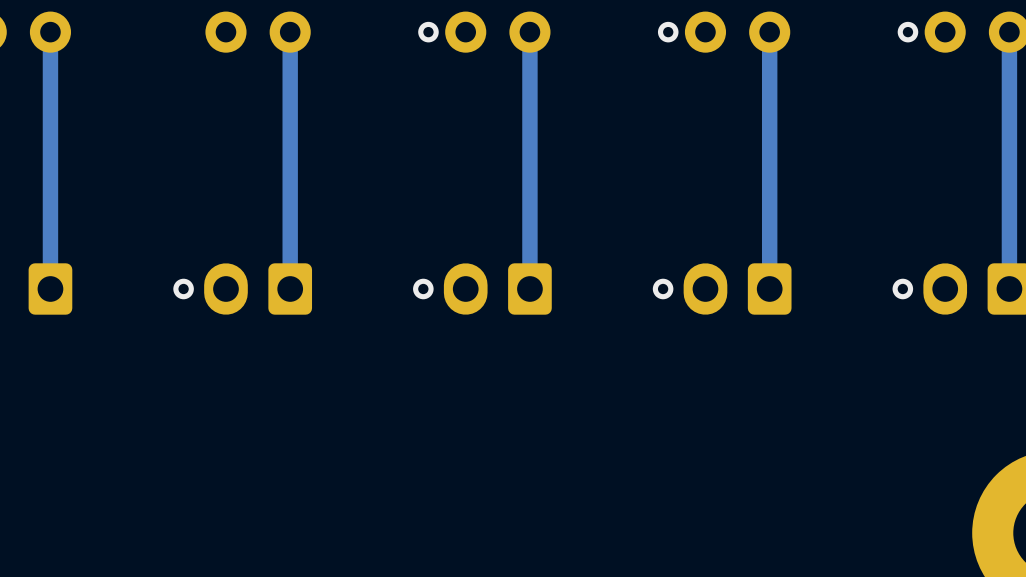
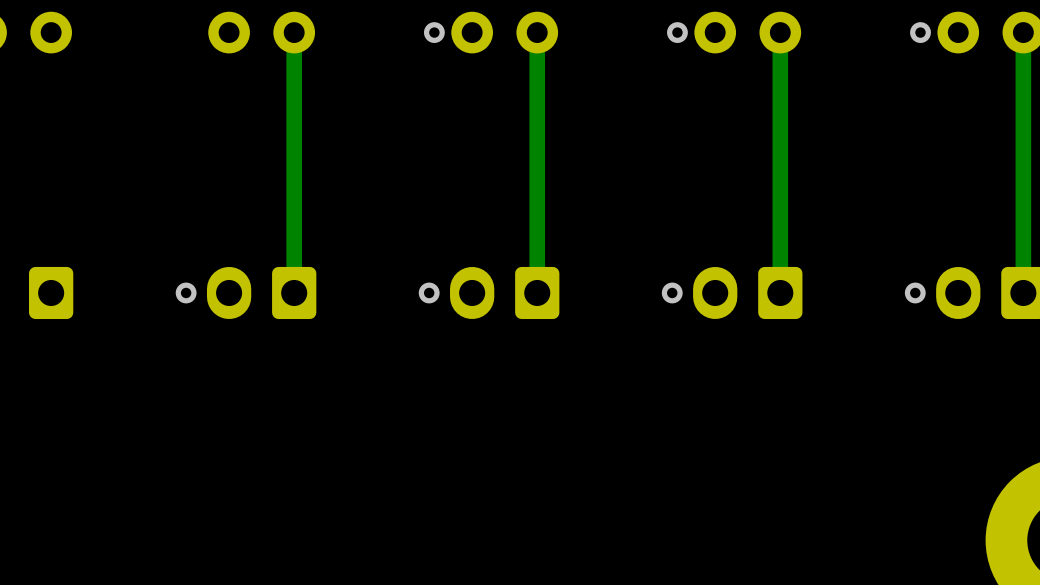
track: (50, 32) (50, 288) -> none

